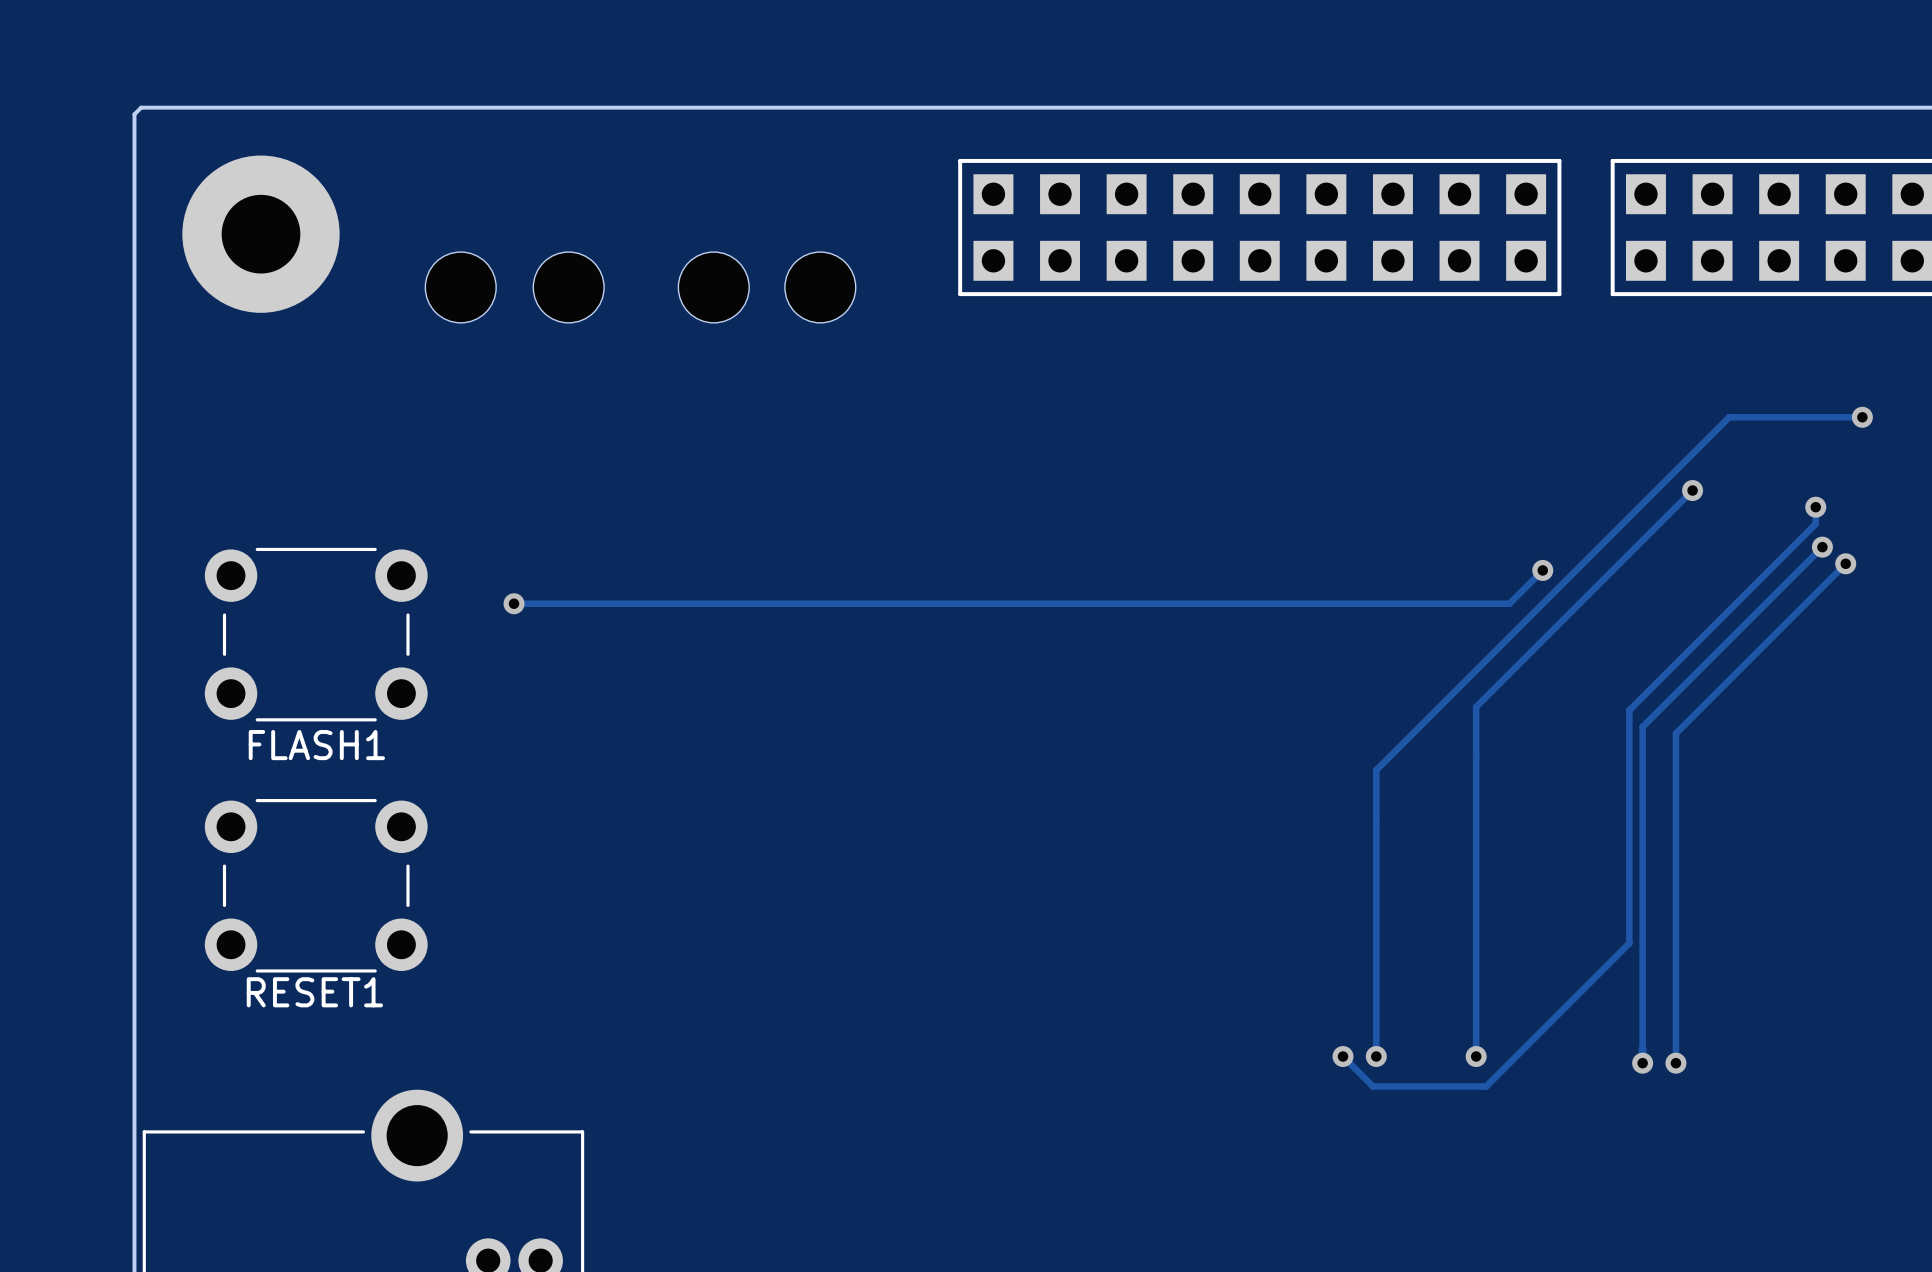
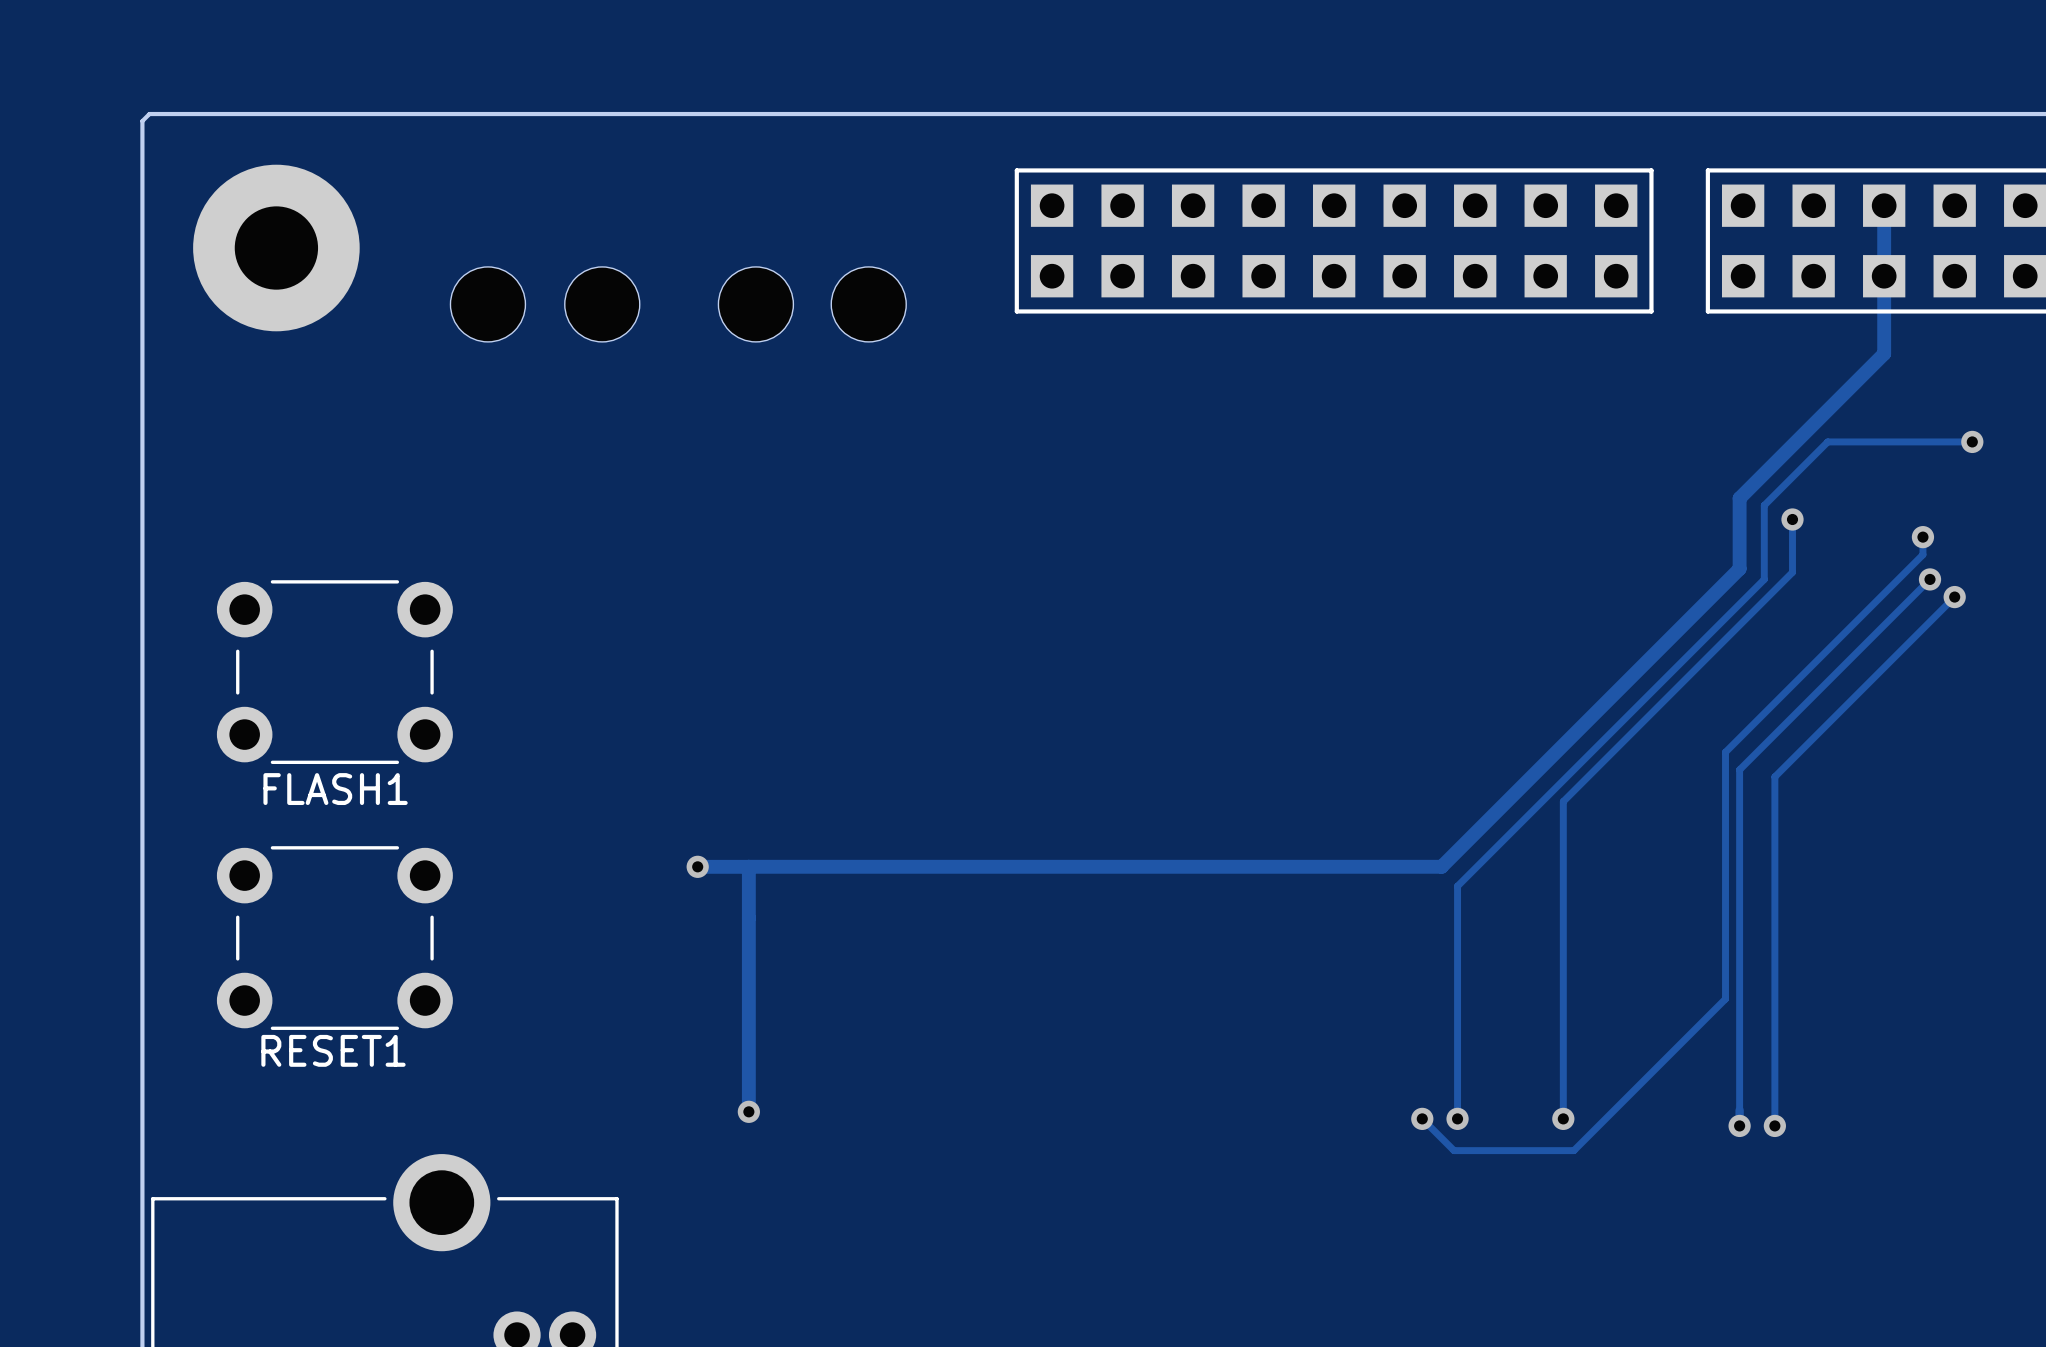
track: none -> (1884, 205) (1884, 353) (1739, 498) (1739, 568) (1441, 866) (697, 866)
track: (1729, 417) (1376, 770) (1376, 836) -> (1831, 441) (1827, 441) (1764, 505) (1764, 579) (1457, 886)
track: (1692, 490) (1476, 706) (1476, 756) -> (1792, 519) (1792, 572) (1563, 801)
track: (1542, 570) (1509, 603) (514, 603) -> none
via: (1542, 570) -> none
via: (514, 603) -> none
via: none -> (697, 866)
track: none -> (748, 866) (748, 1111)
via: none -> (748, 1111)

